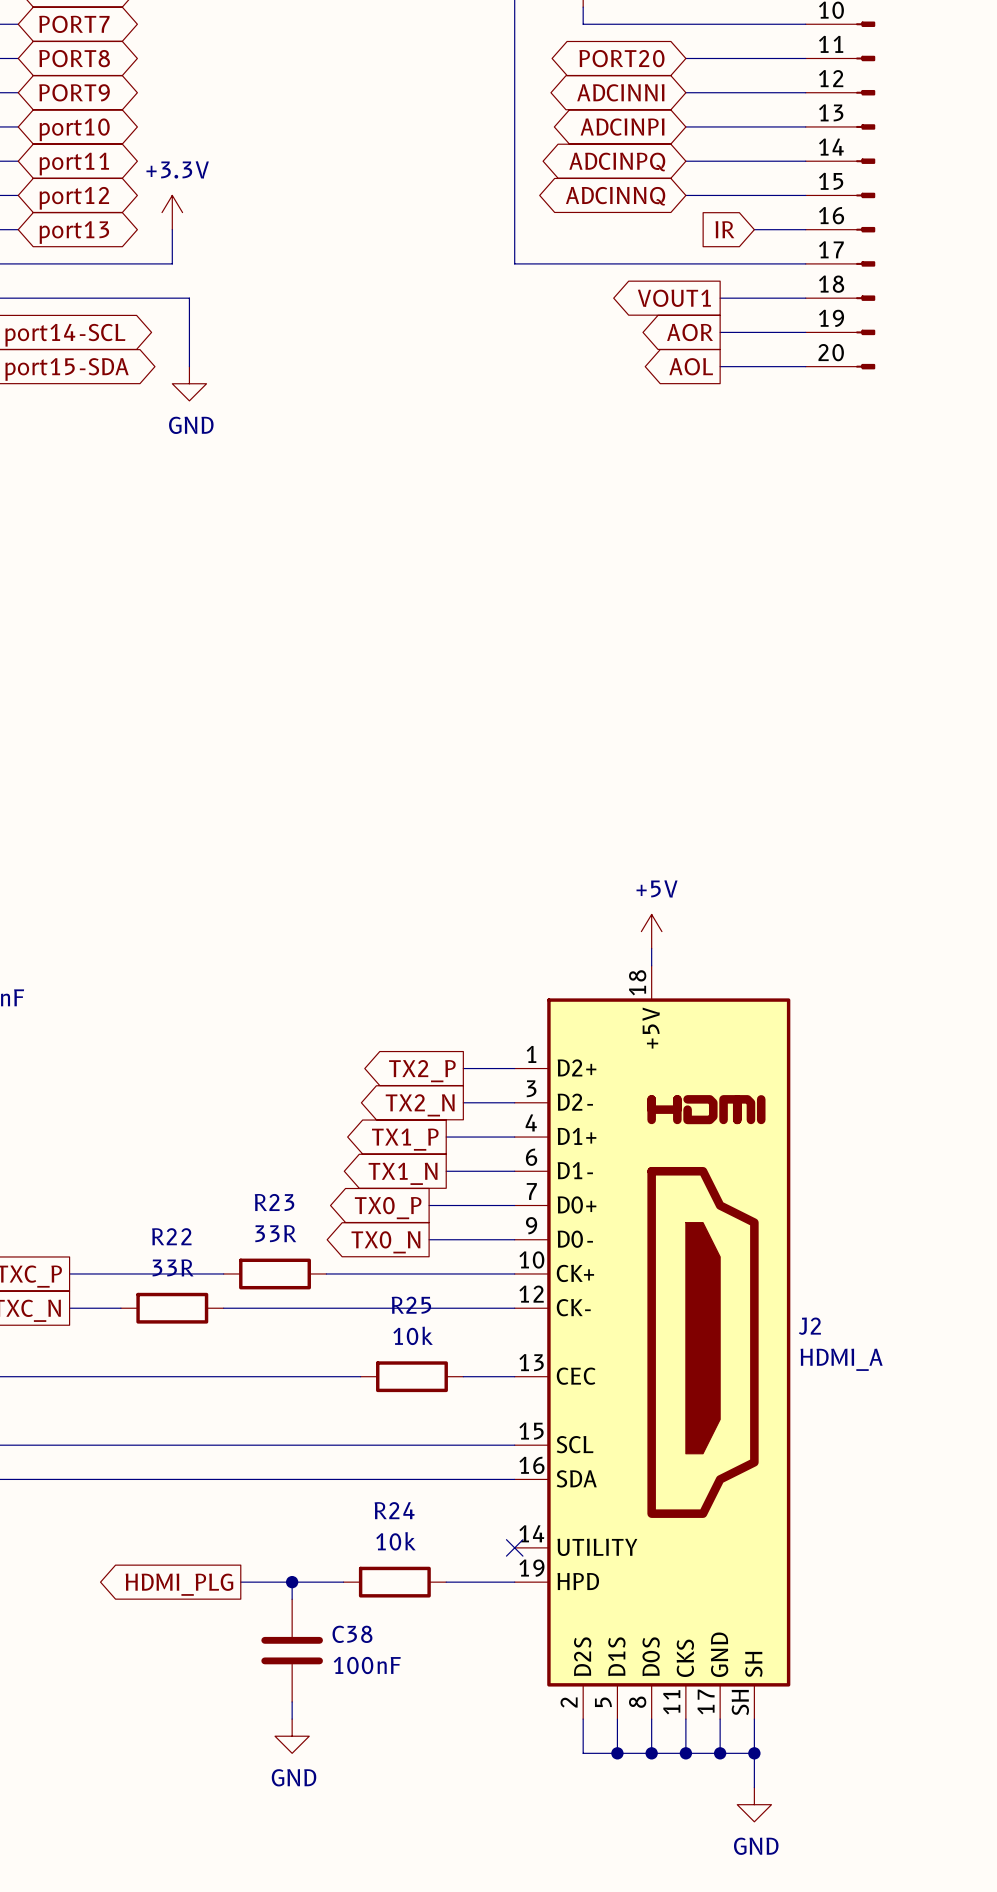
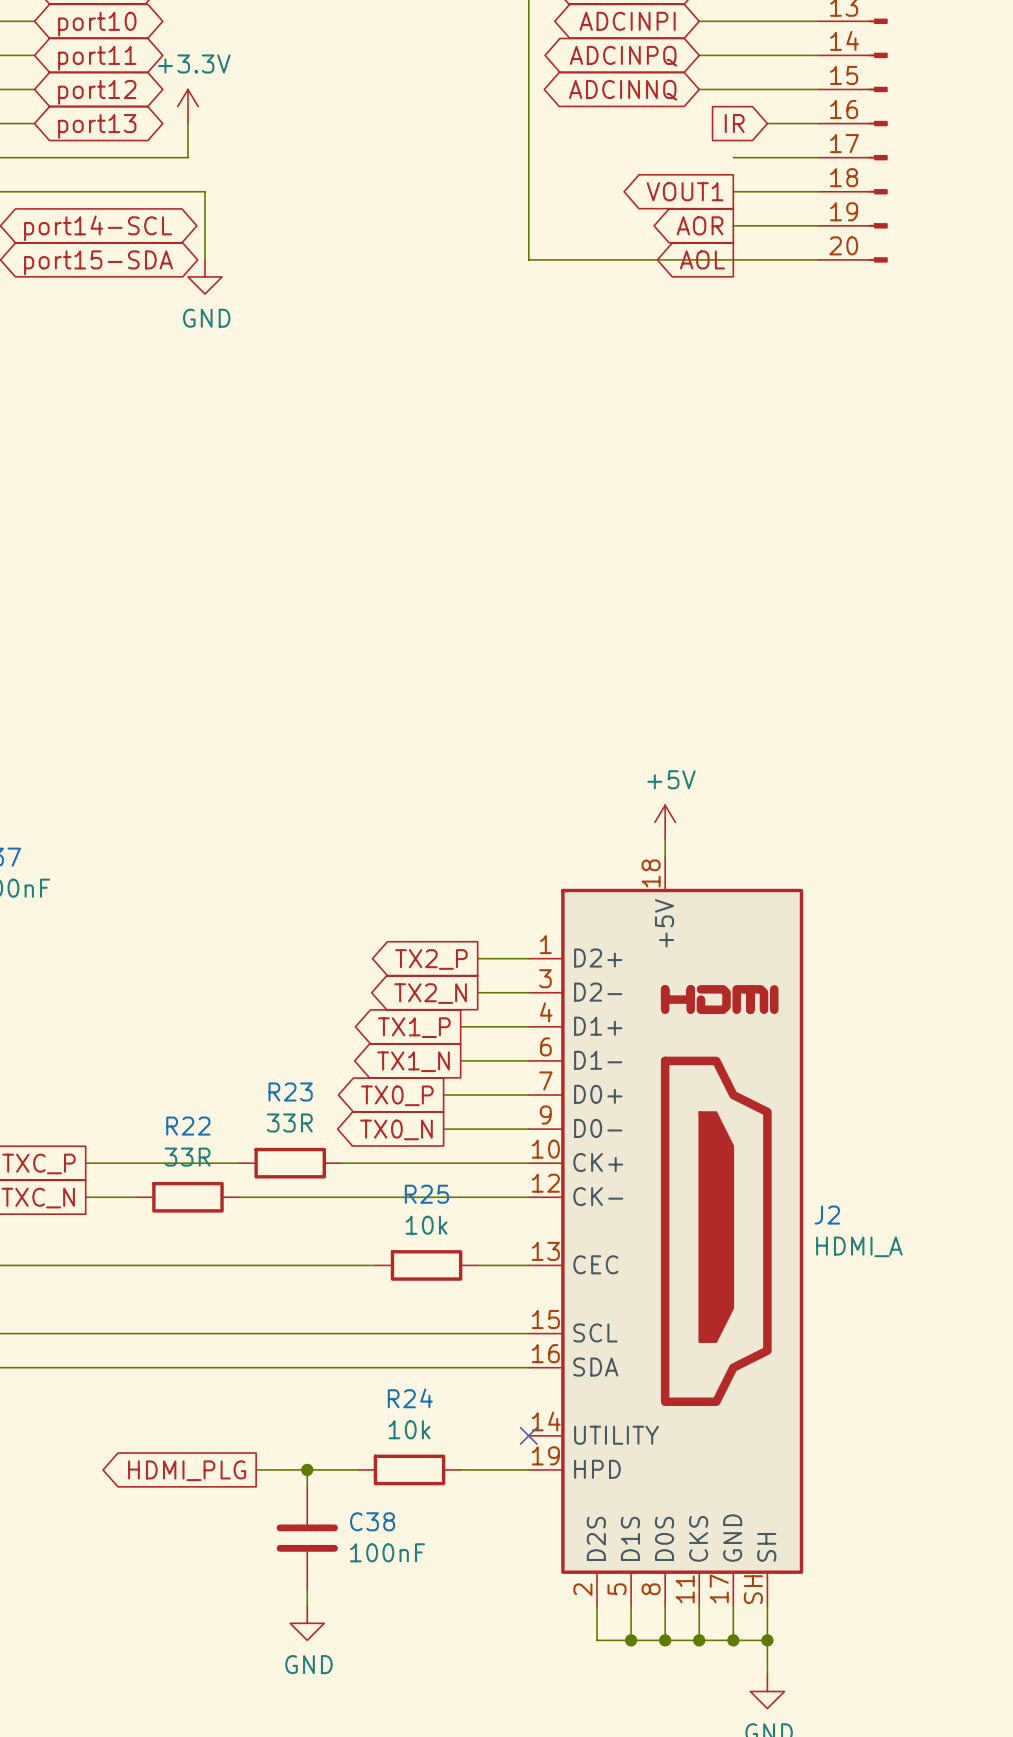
wire: (514, 263) (720, 263) -> (528, 157) (528, 259) (733, 259)

